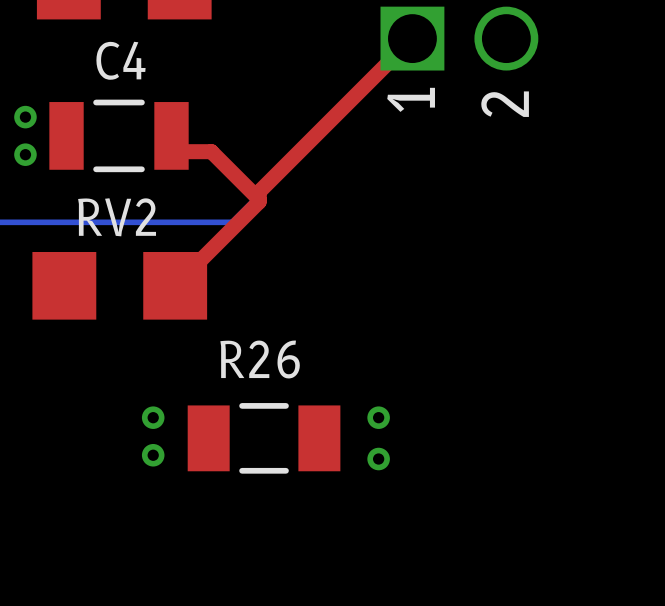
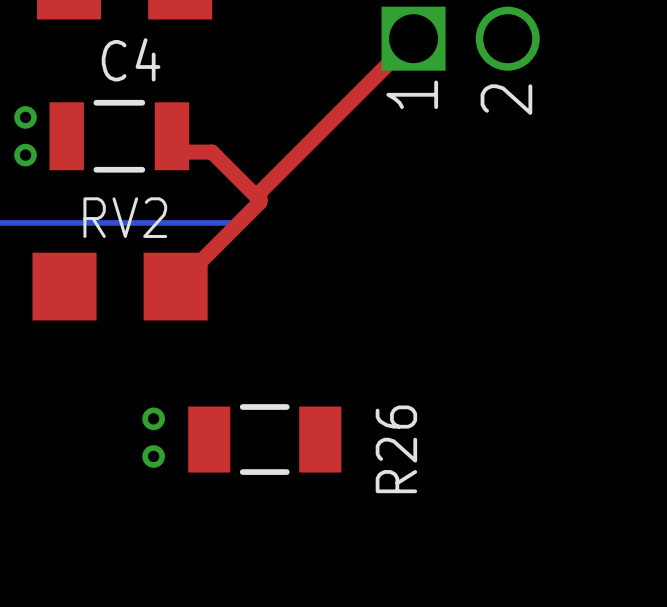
R26 name rotation: 0° (260, 359) -> 90° counterclockwise (396, 449)
R26 name position: R26 (260, 359) -> R26 (396, 449)
via: (378, 417) -> none
via: (378, 459) -> none

